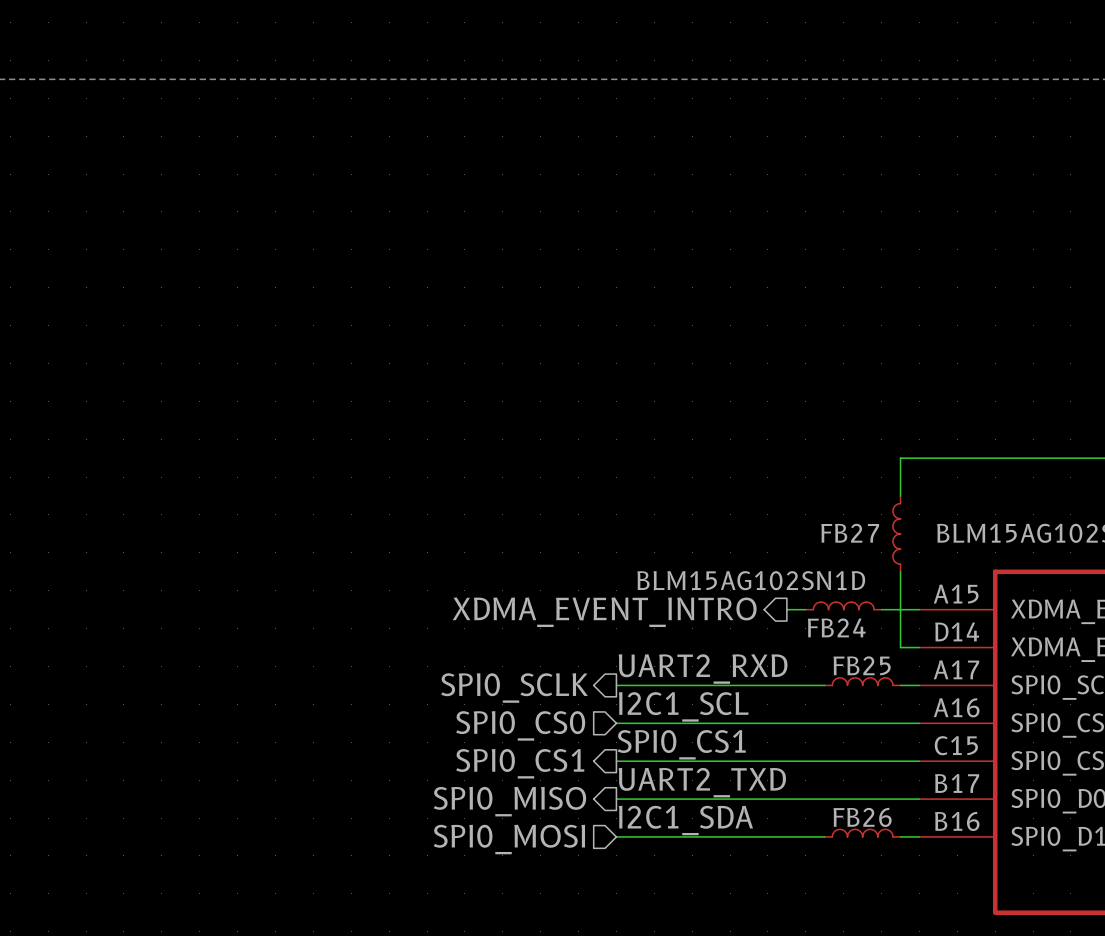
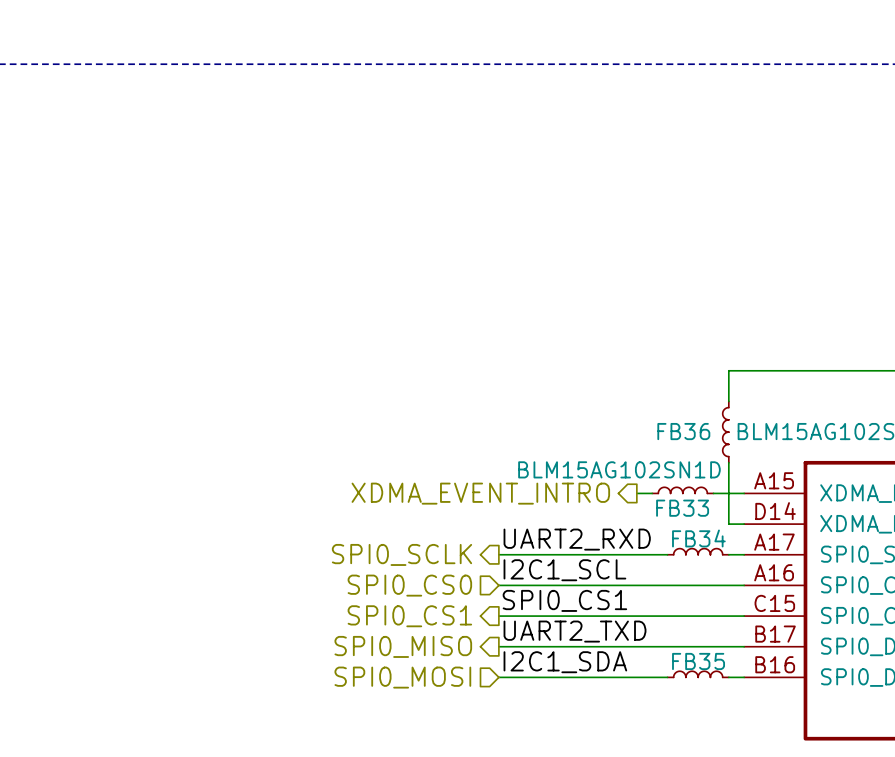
FB27 name: FB27 (850, 533) -> FB36 (683, 431)
FB24 name: FB24 (836, 627) -> FB33 (682, 508)
FB25 name: FB25 (862, 665) -> FB34 (698, 538)
FB26 name: FB26 (862, 817) -> FB35 (698, 661)

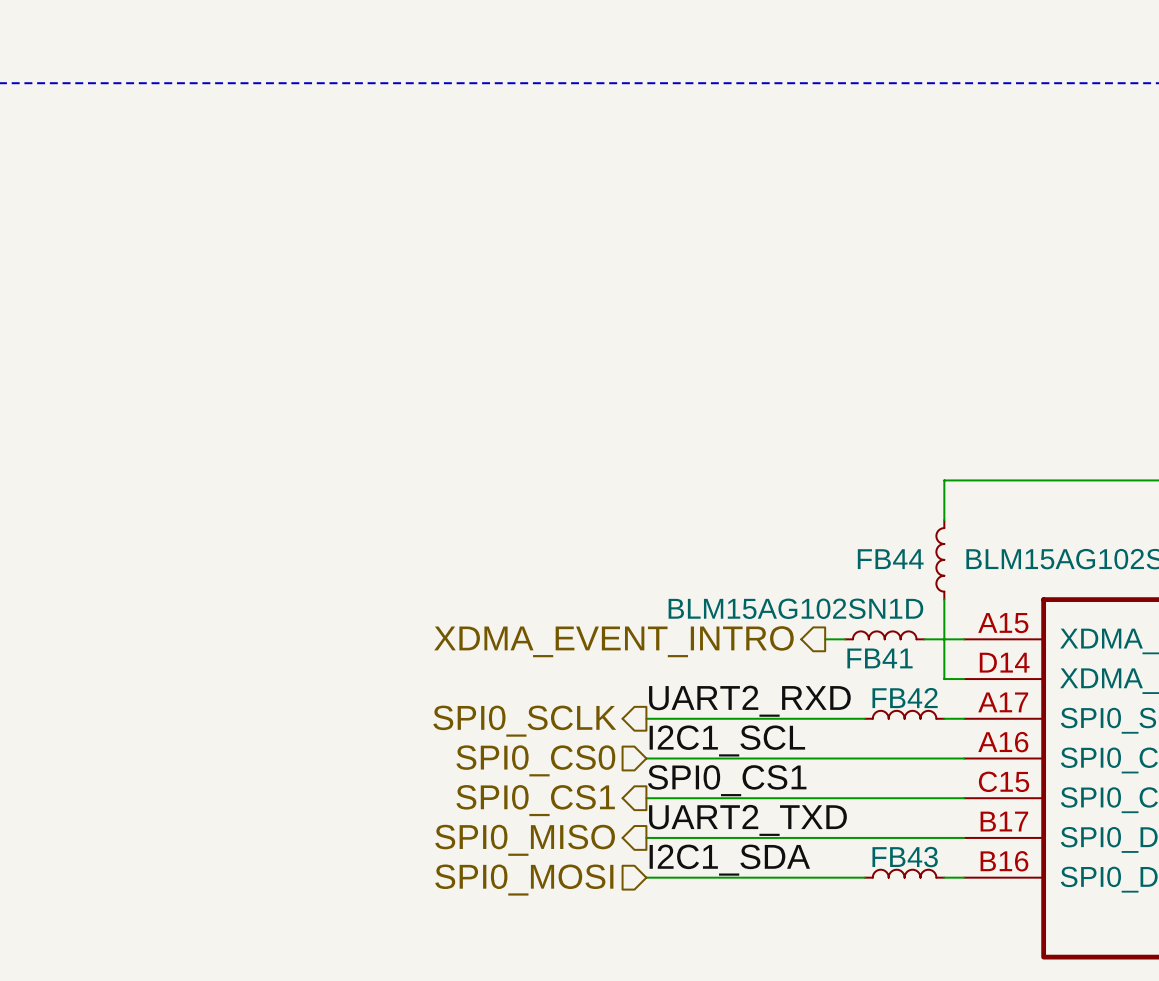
FB36 name: FB36 (683, 431) -> FB44 (890, 559)
FB33 name: FB33 (682, 508) -> FB41 (880, 658)
FB34 name: FB34 (698, 538) -> FB42 (905, 698)
FB35 name: FB35 (698, 661) -> FB43 (905, 857)

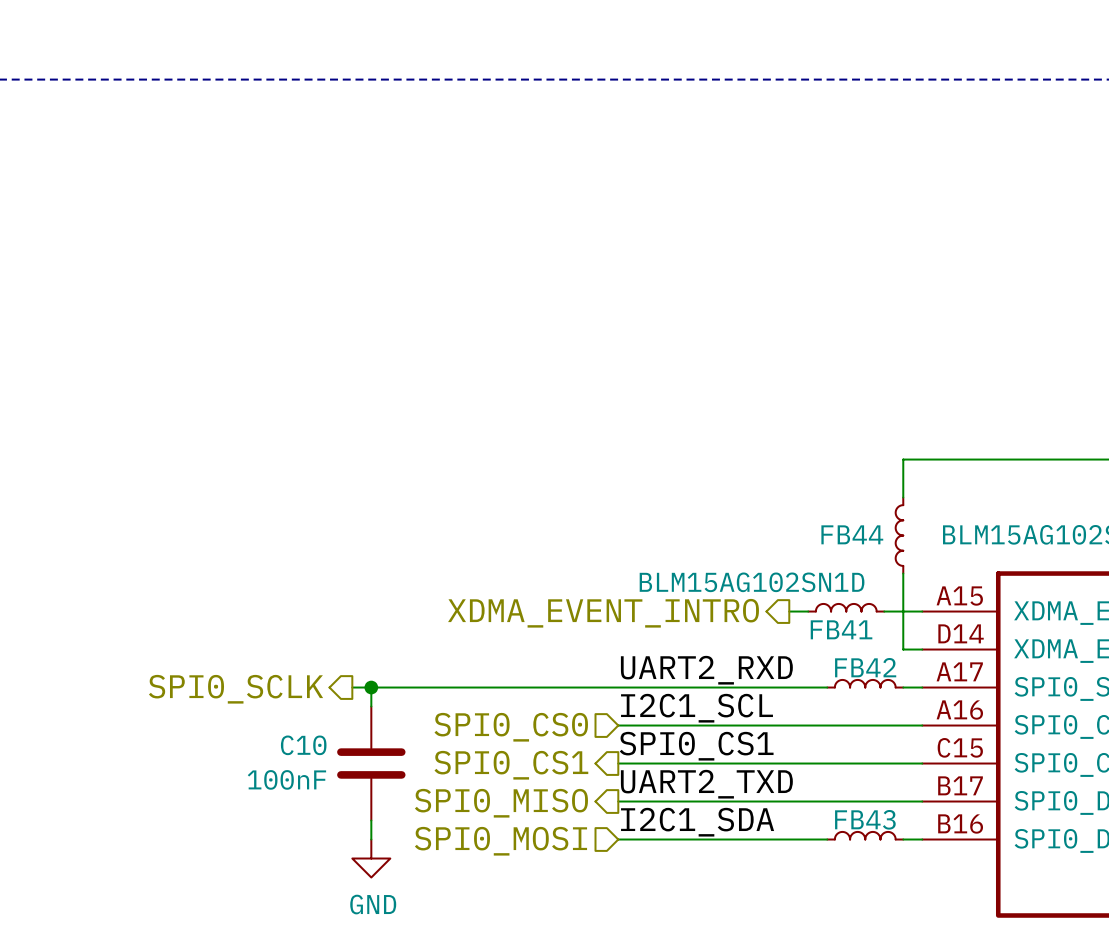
wire: none -> (352, 687) (618, 687)
wire: none -> (371, 687) (371, 706)
junction: none -> (371, 687)
hierarchical label position: SPI0_SCLK (524, 721) -> SPI0_SCLK (236, 689)
C10: none -> 100nF (371, 763)
wire: none -> (371, 820) (371, 839)
power symbol: none -> GND (371, 858)

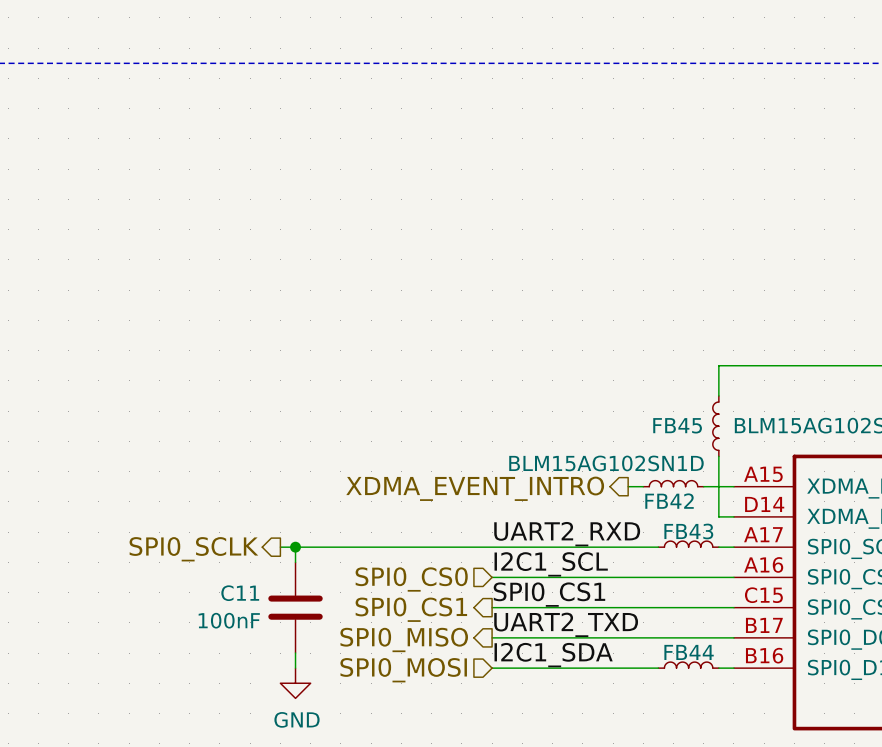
FB44 name: FB44 (852, 534) -> FB45 (677, 425)
FB41 name: FB41 (841, 629) -> FB42 (669, 501)
FB42 name: FB42 (865, 667) -> FB43 (688, 531)
C10 name: C10 (303, 745) -> C11 (240, 593)
FB43 name: FB43 (865, 819) -> FB44 (689, 652)

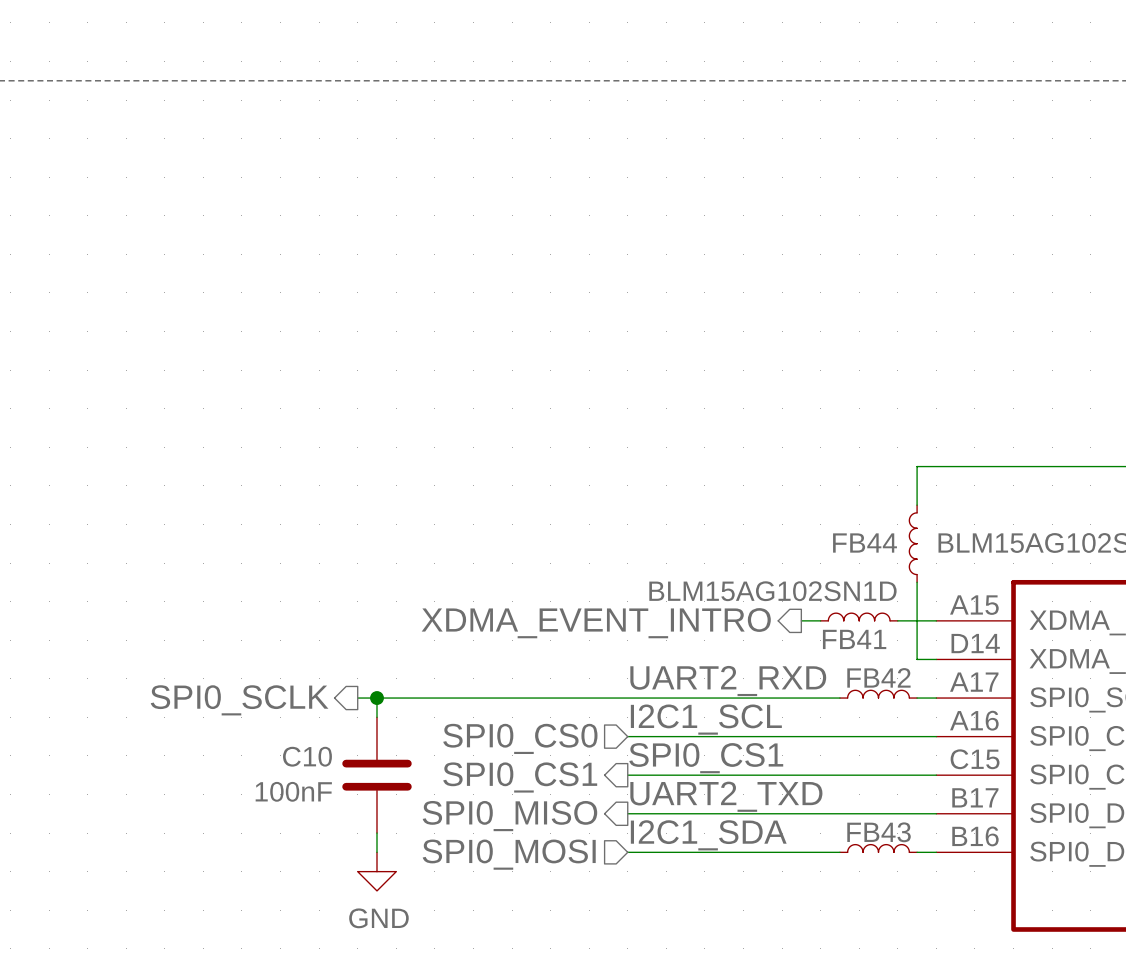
FB45 name: FB45 (677, 425) -> FB44 (865, 543)
FB42 name: FB42 (669, 501) -> FB41 (854, 639)
FB43 name: FB43 (688, 531) -> FB42 (878, 677)
C11 name: C11 (240, 593) -> C10 (307, 756)
FB44 name: FB44 (689, 652) -> FB43 (879, 832)

